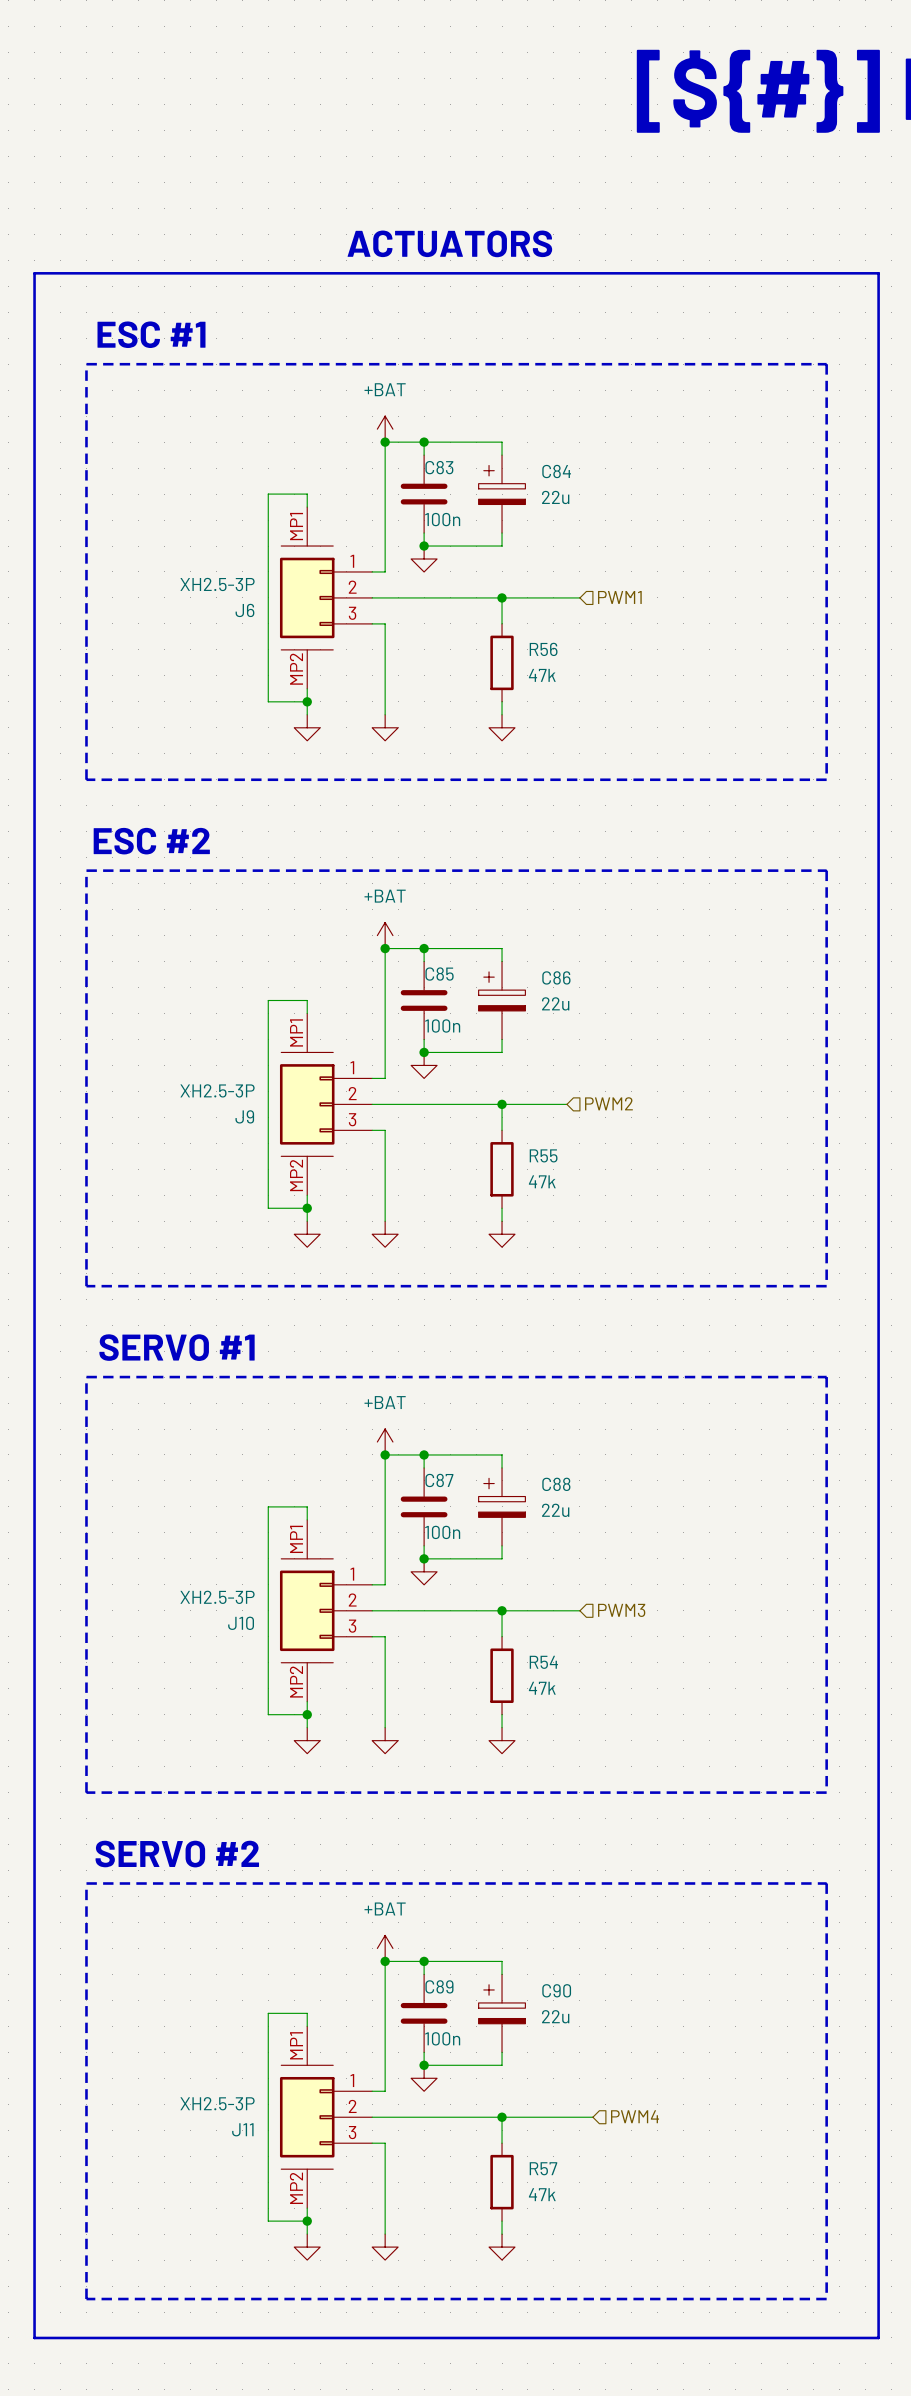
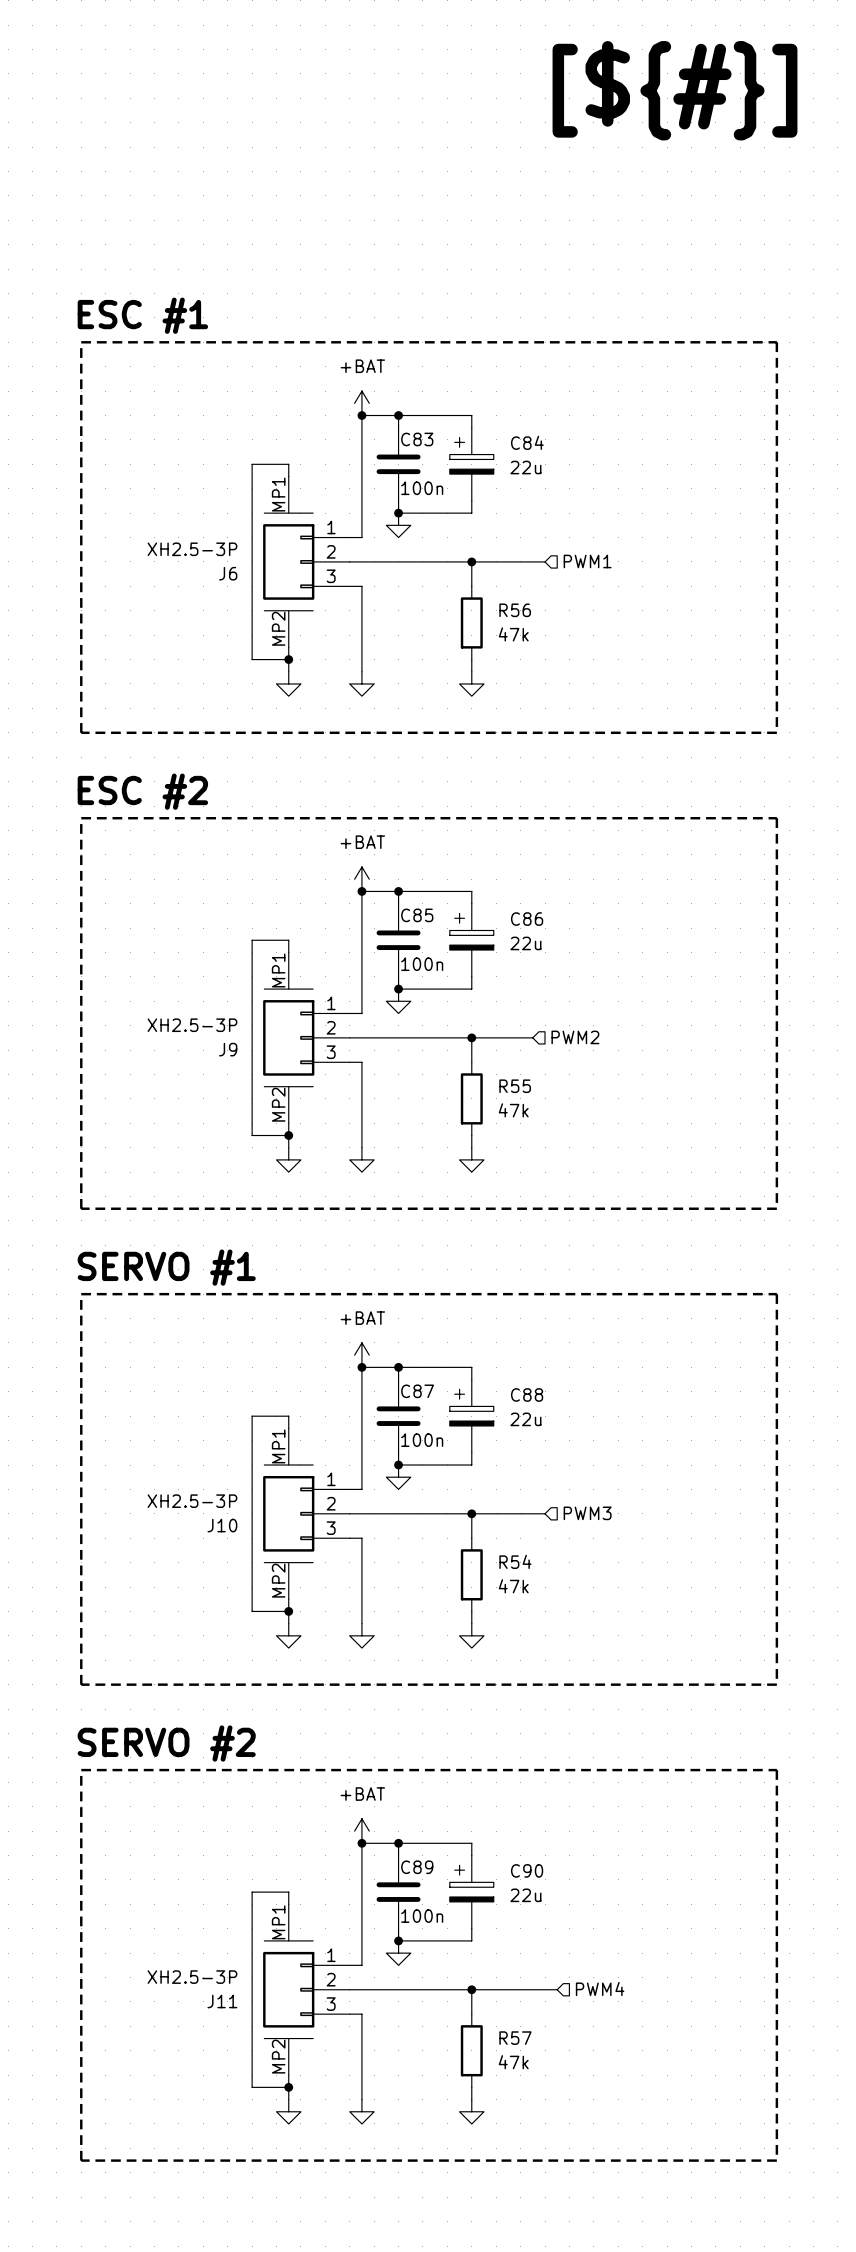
text: ACTUATORS (449, 243) -> none
line: (34, 273) (878, 273) (878, 2337) (34, 2337) (34, 273) -> none

